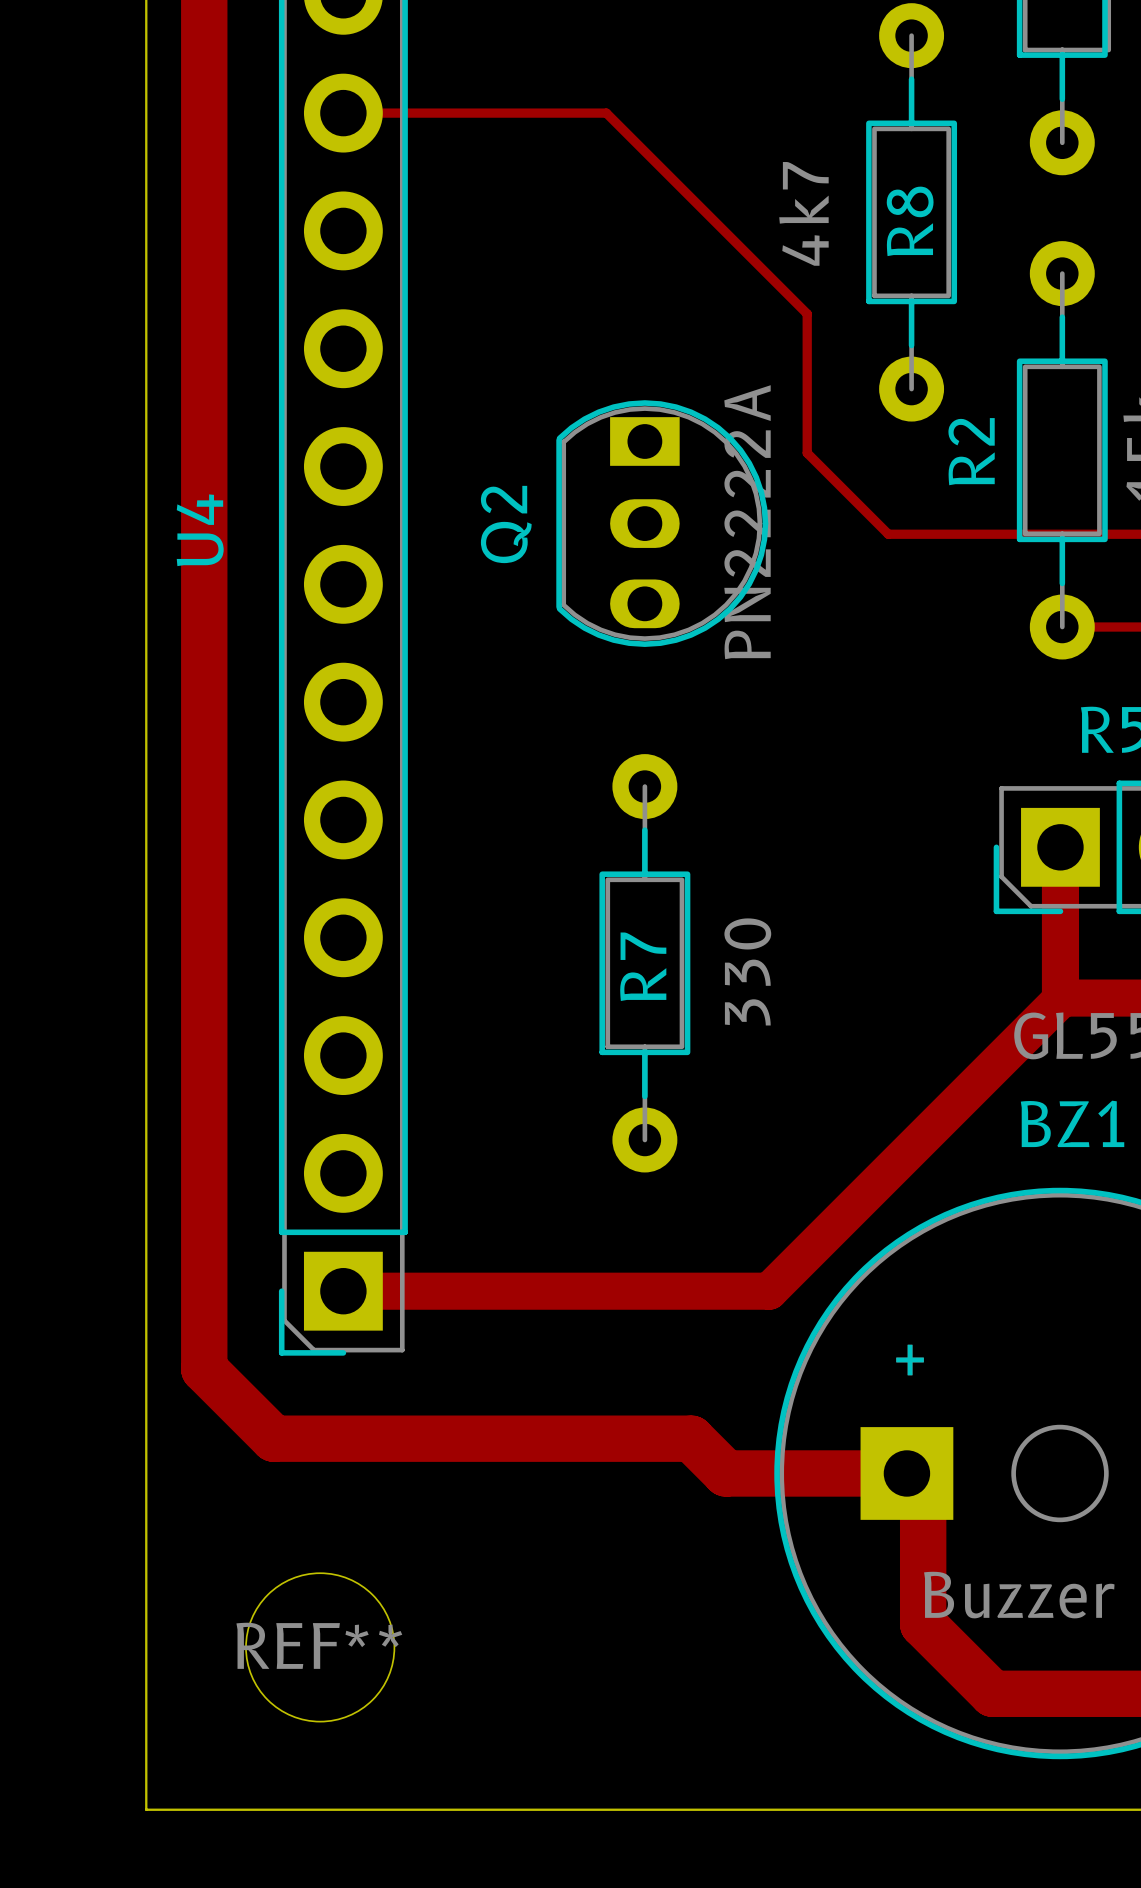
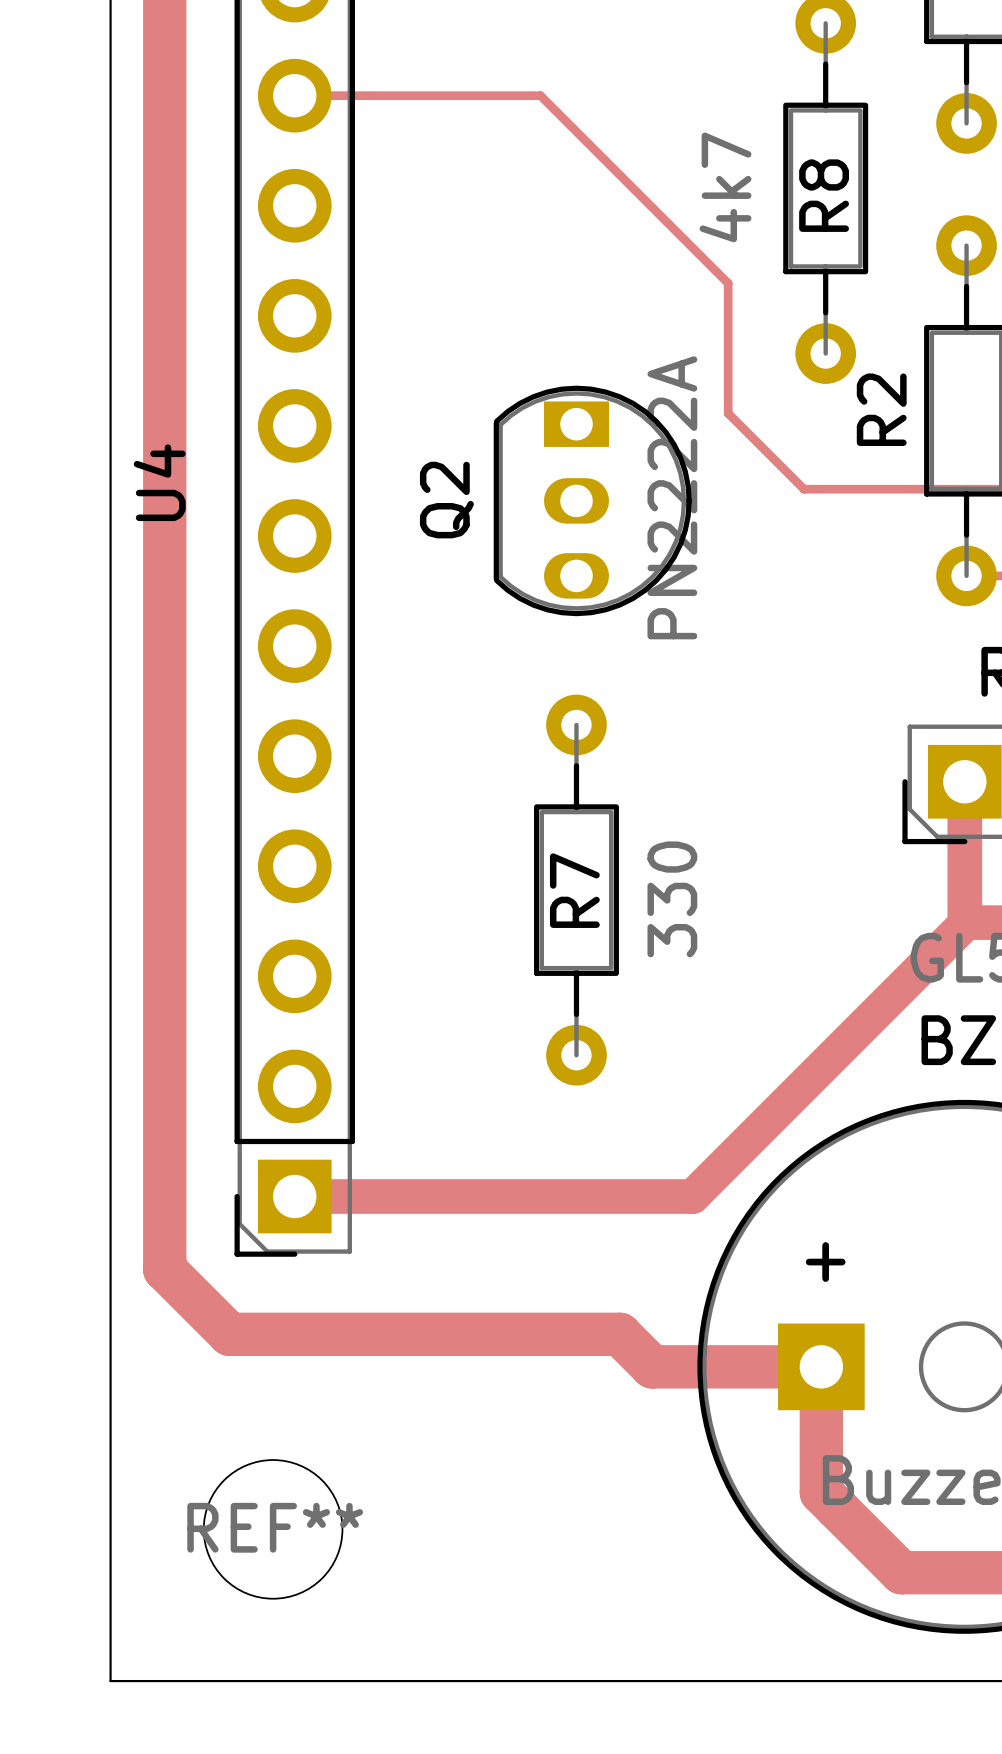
Q2 position: (662, 523) -> (592, 500)
track: (923, 1473) (923, 1624) -> (821, 1366) (821, 1492) (836, 1507)

